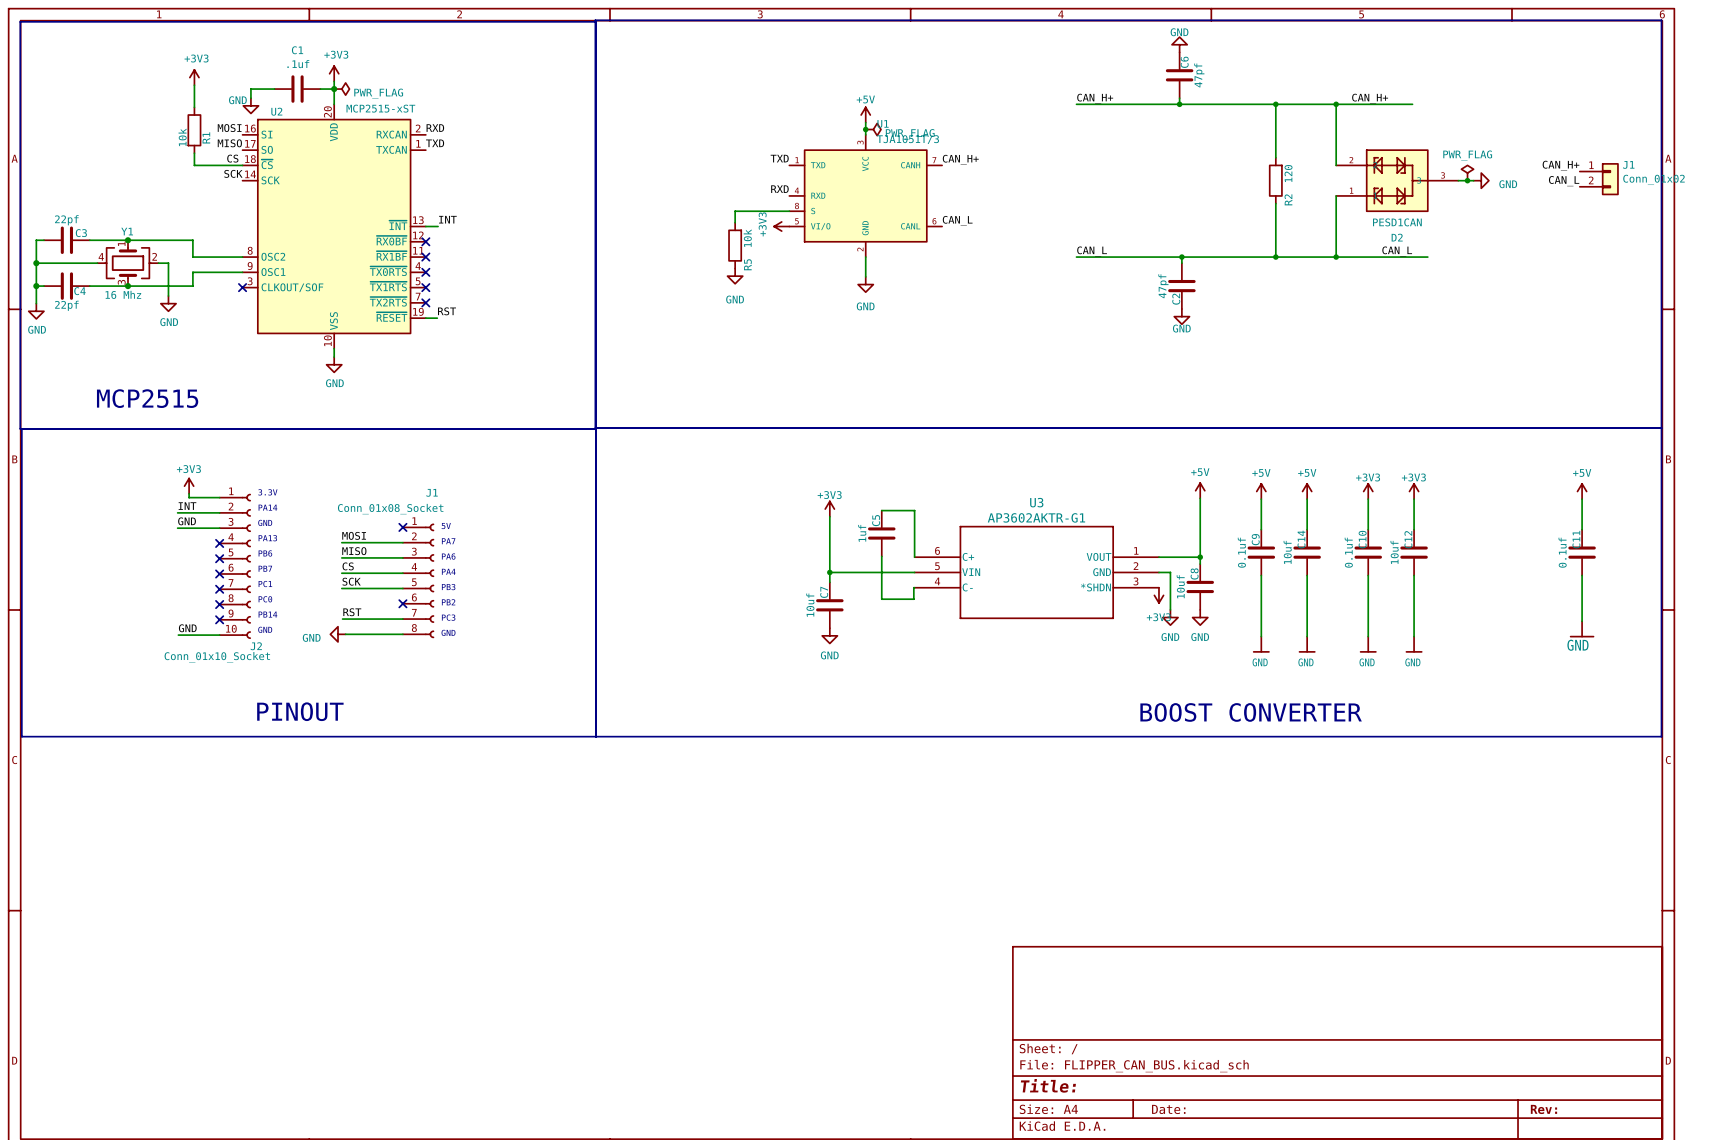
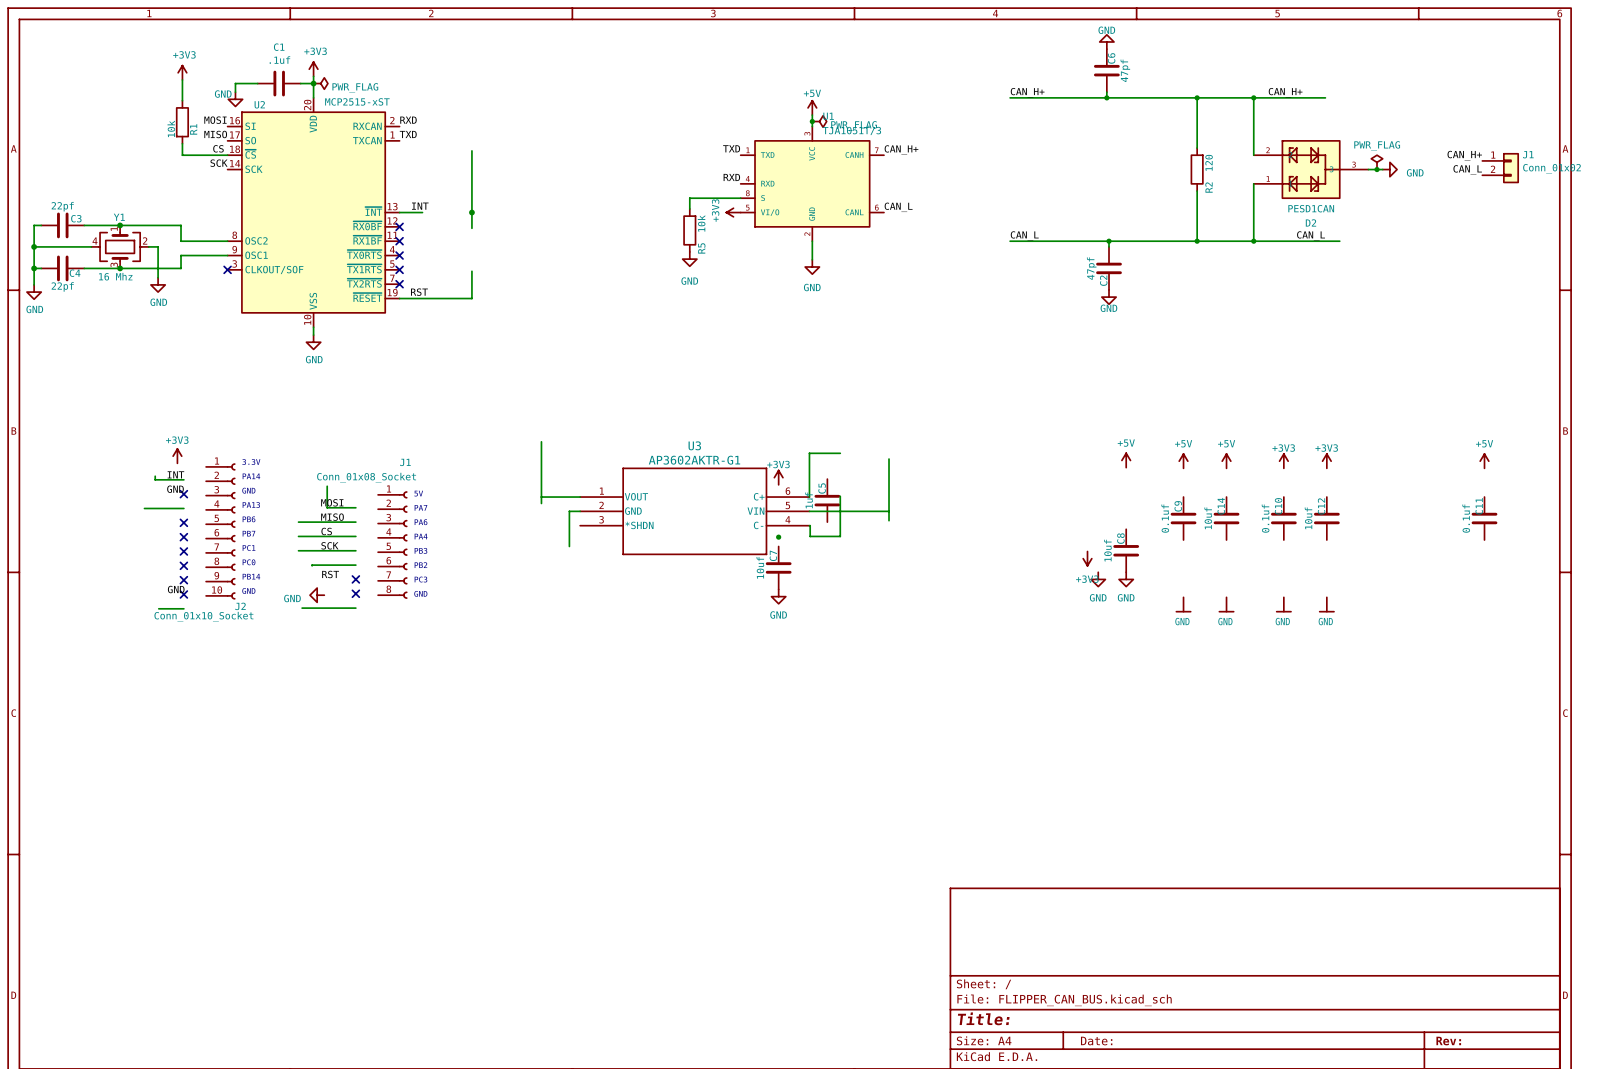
wire: none -> (471, 150) (471, 228)
wire: none -> (411, 212) (422, 212)
junction: none -> (471, 212)
wire: none -> (471, 271) (471, 298) (410, 298)
text: MCP2515 (147, 398) -> none
line: (596, 428) (20, 428) (20, 21) (596, 21) (596, 736) -> none
line: (1661, 428) (595, 428) (595, 20) (1661, 20) (1661, 736) (21, 736) (21, 428) -> none
wire: none -> (541, 441) (541, 503)
wire: none -> (840, 453) (809, 453) (809, 497)
wire: (189, 493) (189, 497) (219, 497) -> (155, 476) (155, 479) (183, 479)
wire: (1200, 498) (1200, 564) -> none
wire: (1261, 499) (1261, 529) -> none
wire: (1307, 499) (1307, 529) -> none
wire: (1368, 499) (1368, 529) -> none
wire: (1414, 499) (1414, 529) -> none
wire: (1582, 499) (1582, 529) -> none
wire: (881, 510) (914, 510) (914, 557) -> none
wire: (177, 512) (219, 512) -> none
wire: (829, 516) (829, 582) -> (889, 459) (889, 520)
wire: none -> (327, 486) (327, 507) (355, 507)
no-connect mark: none -> (183, 494)
no-connect mark: (402, 527) -> none
wire: (177, 528) (219, 528) -> (144, 508) (183, 508)
wire: none -> (840, 496) (840, 536) (810, 536) (809, 525)
wire: none -> (541, 497) (580, 497)
wire: (341, 542) (402, 542) -> (298, 522) (355, 522)
no-connect mark: (219, 543) -> none
wire: none -> (580, 511) (569, 511) (569, 546)
wire: (881, 556) (881, 599) (913, 599) (914, 587) -> none
no-connect mark: none -> (183, 522)
wire: (341, 557) (402, 557) -> (298, 536) (355, 536)
wire: (1158, 557) (1200, 557) -> none
junction: (1200, 557) -> none
no-connect mark: (219, 558) -> none
no-connect mark: none -> (183, 537)
wire: (829, 572) (914, 572) -> (809, 511) (889, 511)
U3 flip: as is (1036, 572) -> left-right (694, 511)
U3 position: (1036, 572) -> (694, 511)
wire: (1158, 572) (1170, 572) (1170, 609) -> none
no-connect mark: (219, 573) -> none
wire: (341, 573) (402, 573) -> (298, 550) (355, 550)
wire: (1261, 575) (1261, 636) -> none
wire: (1307, 575) (1307, 636) -> none
wire: (1368, 575) (1368, 636) -> none
wire: (1414, 575) (1414, 636) -> none
wire: (1582, 575) (1582, 621) -> none
no-connect mark: none -> (183, 551)
wire: (341, 588) (402, 588) -> none
no-connect mark: (219, 589) -> none
wire: none -> (355, 565) (312, 565)
no-connect mark: none -> (183, 565)
no-connect mark: (402, 603) -> none
no-connect mark: (219, 604) -> none
no-connect mark: none -> (355, 579)
no-connect mark: none -> (183, 580)
no-connect mark: (219, 619) -> none
wire: (342, 619) (402, 619) -> none
power symbol: GND (1582, 629) -> none
no-connect mark: none -> (355, 593)
no-connect mark: none -> (183, 594)
wire: (345, 634) (402, 634) -> (302, 608) (355, 608)
wire: (178, 635) (219, 635) -> none
wire: none -> (158, 608) (183, 608)
text: PINOUT (300, 711) -> none
text: BOOST CONVERTER (1251, 712) -> none

